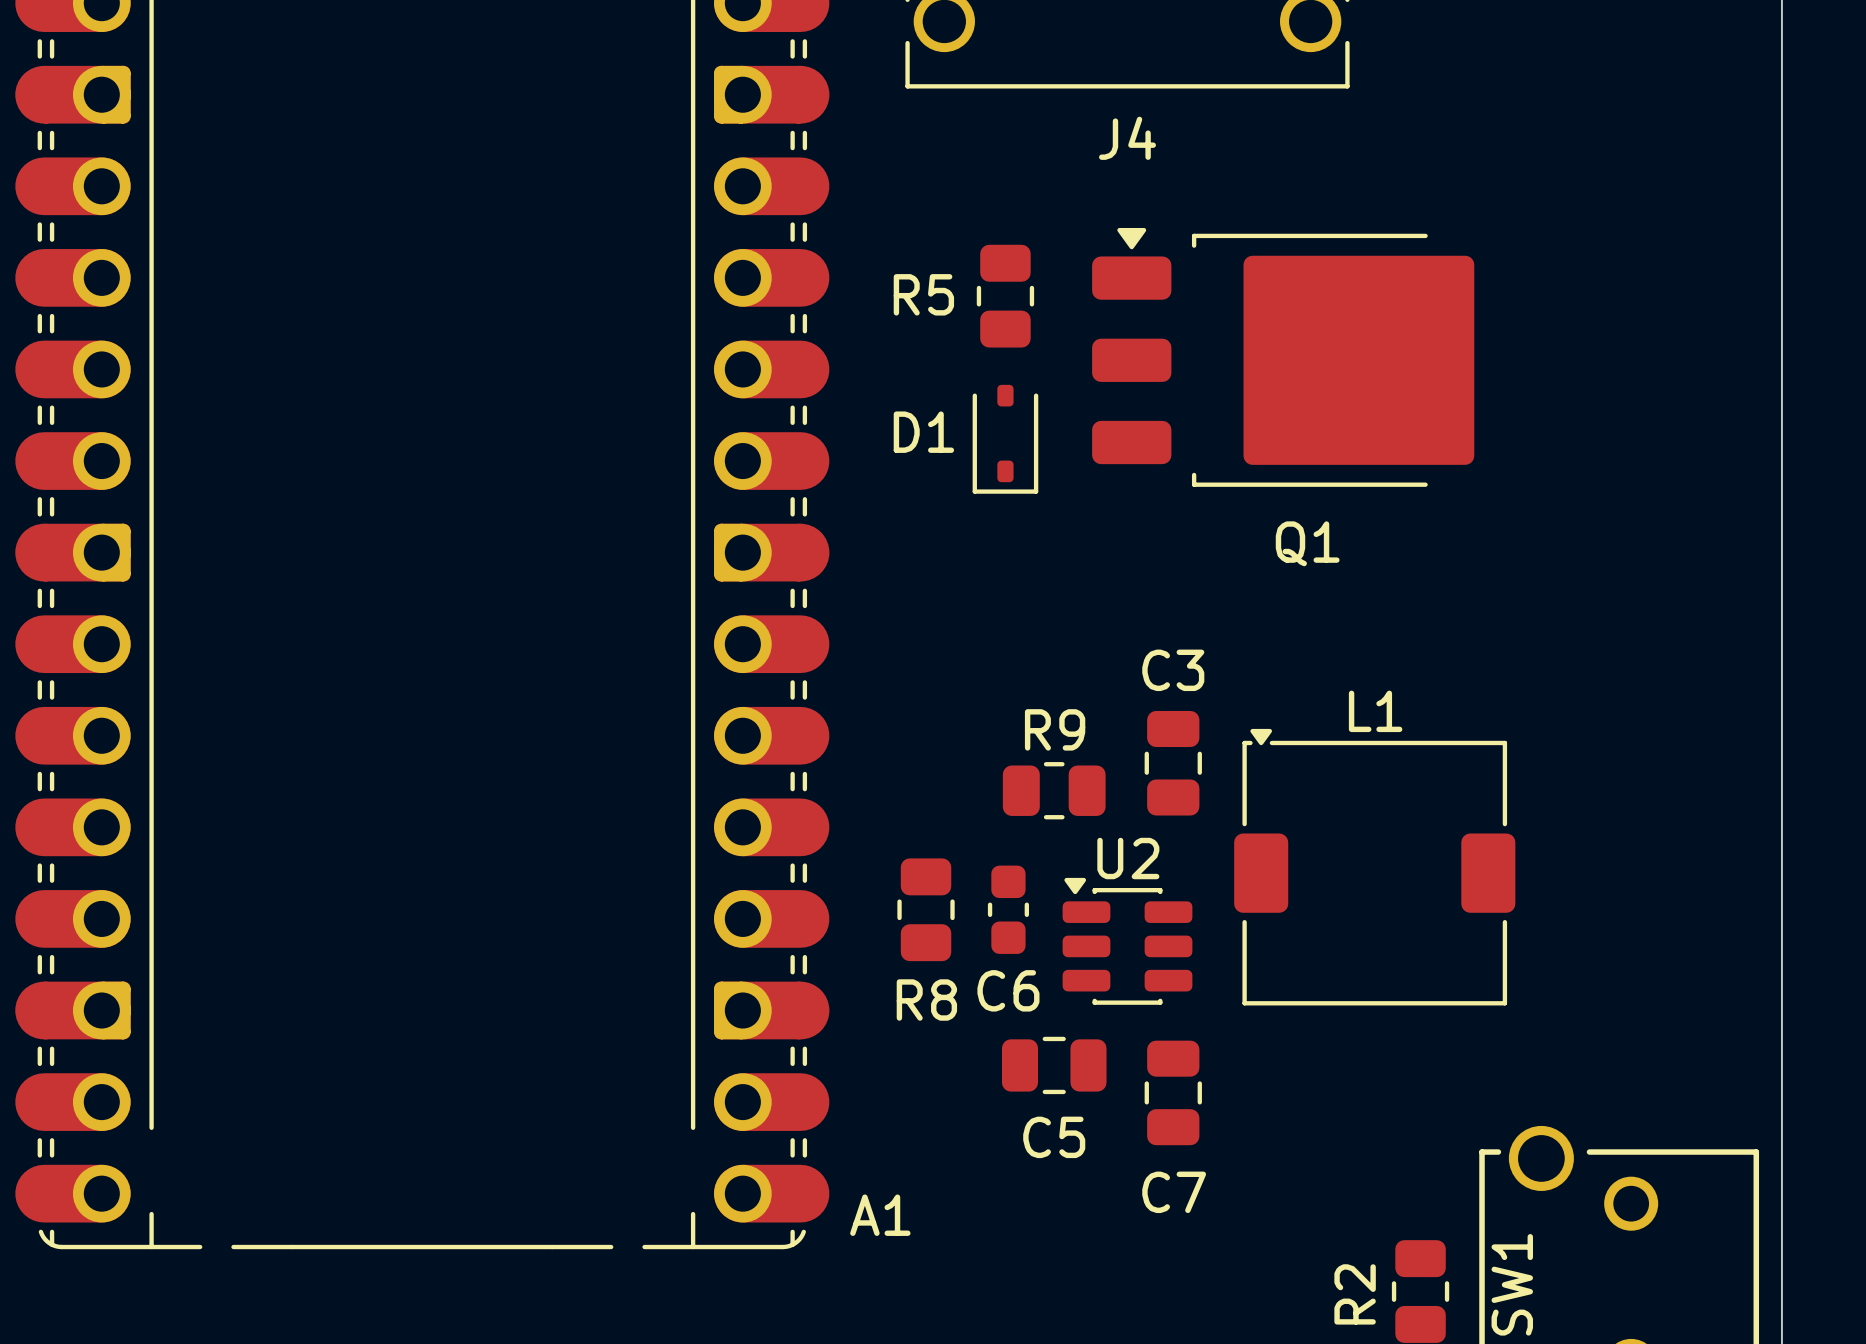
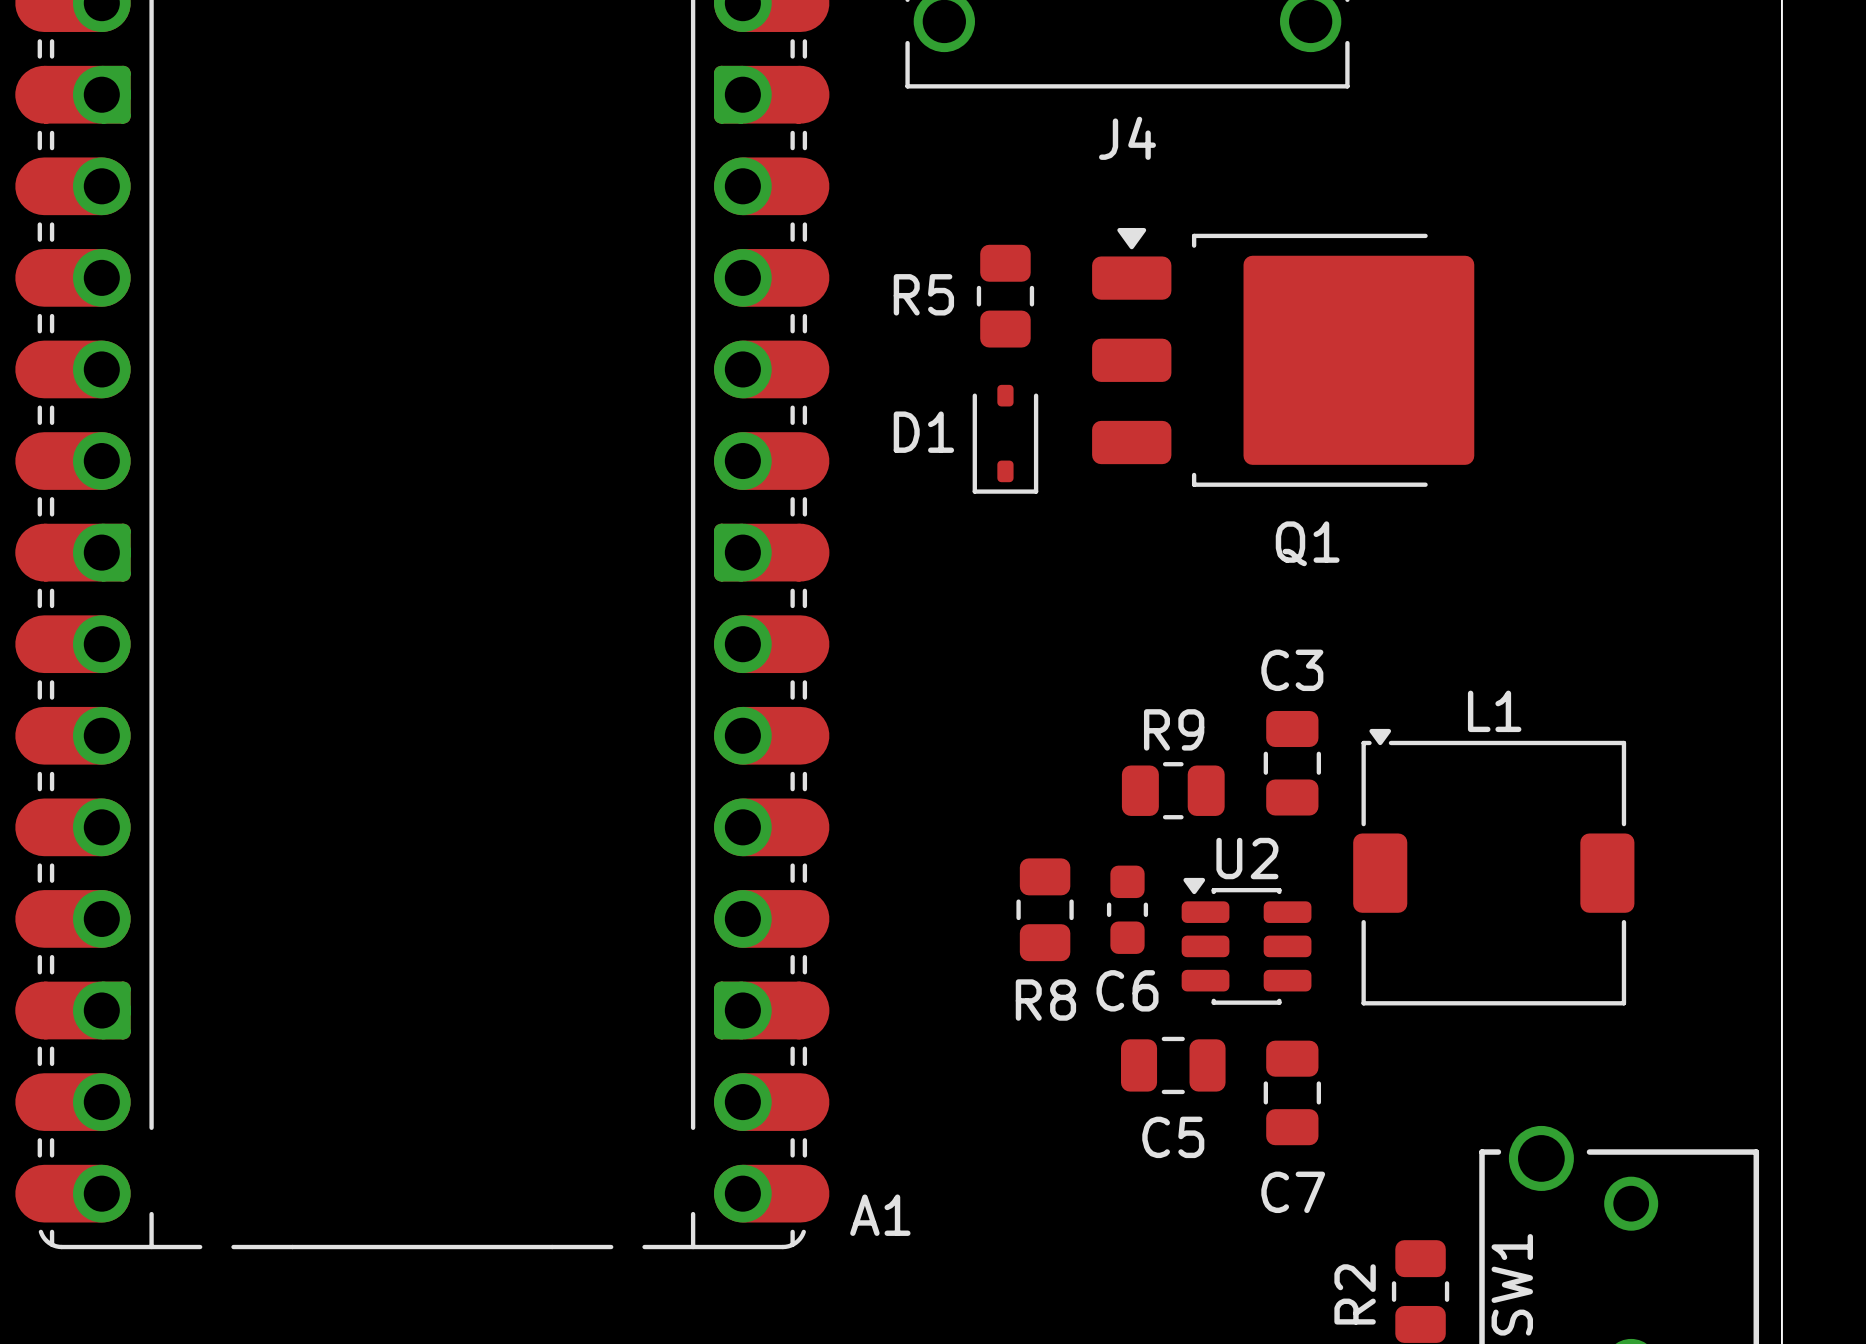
C3 position: (1173, 763) -> (1292, 763)
R9 position: (1054, 790) -> (1173, 790)
L1 position: (1374, 867) -> (1493, 867)
R8 position: (926, 909) -> (1045, 909)
C6 position: (1008, 909) -> (1127, 909)
U2 position: (1127, 941) -> (1246, 941)
C5 position: (1054, 1065) -> (1173, 1065)
C7 position: (1173, 1092) -> (1292, 1092)

